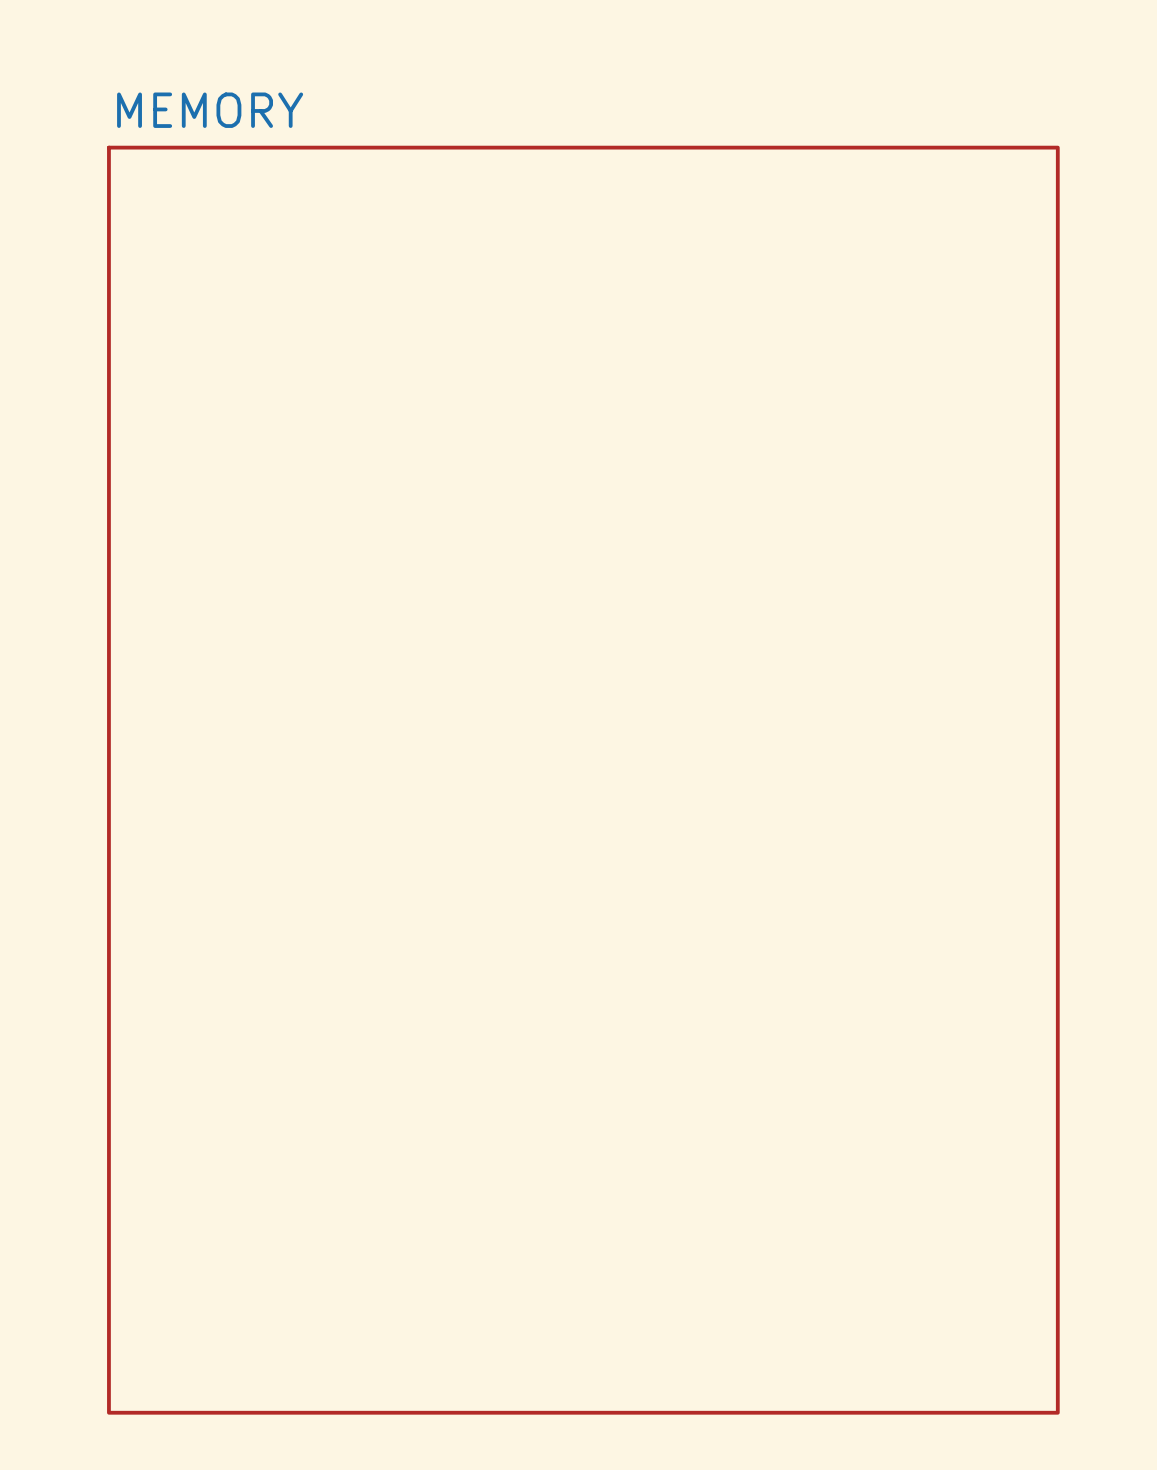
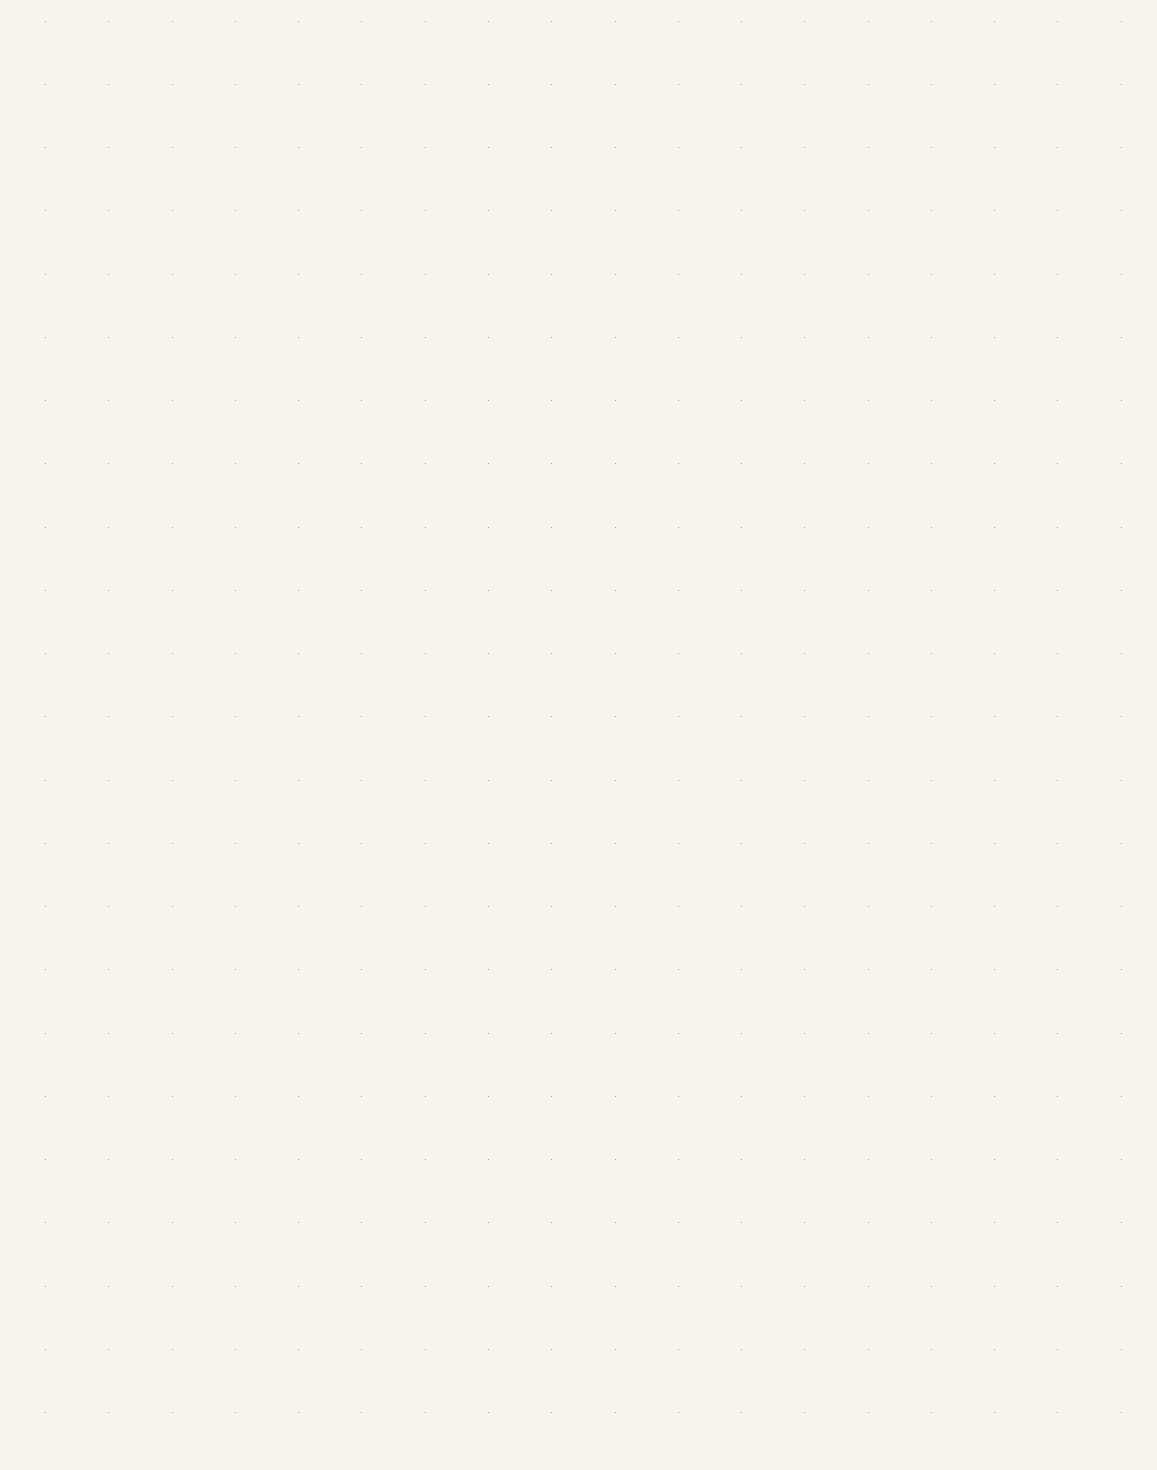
sheet MEMORY: (583, 780) -> none

